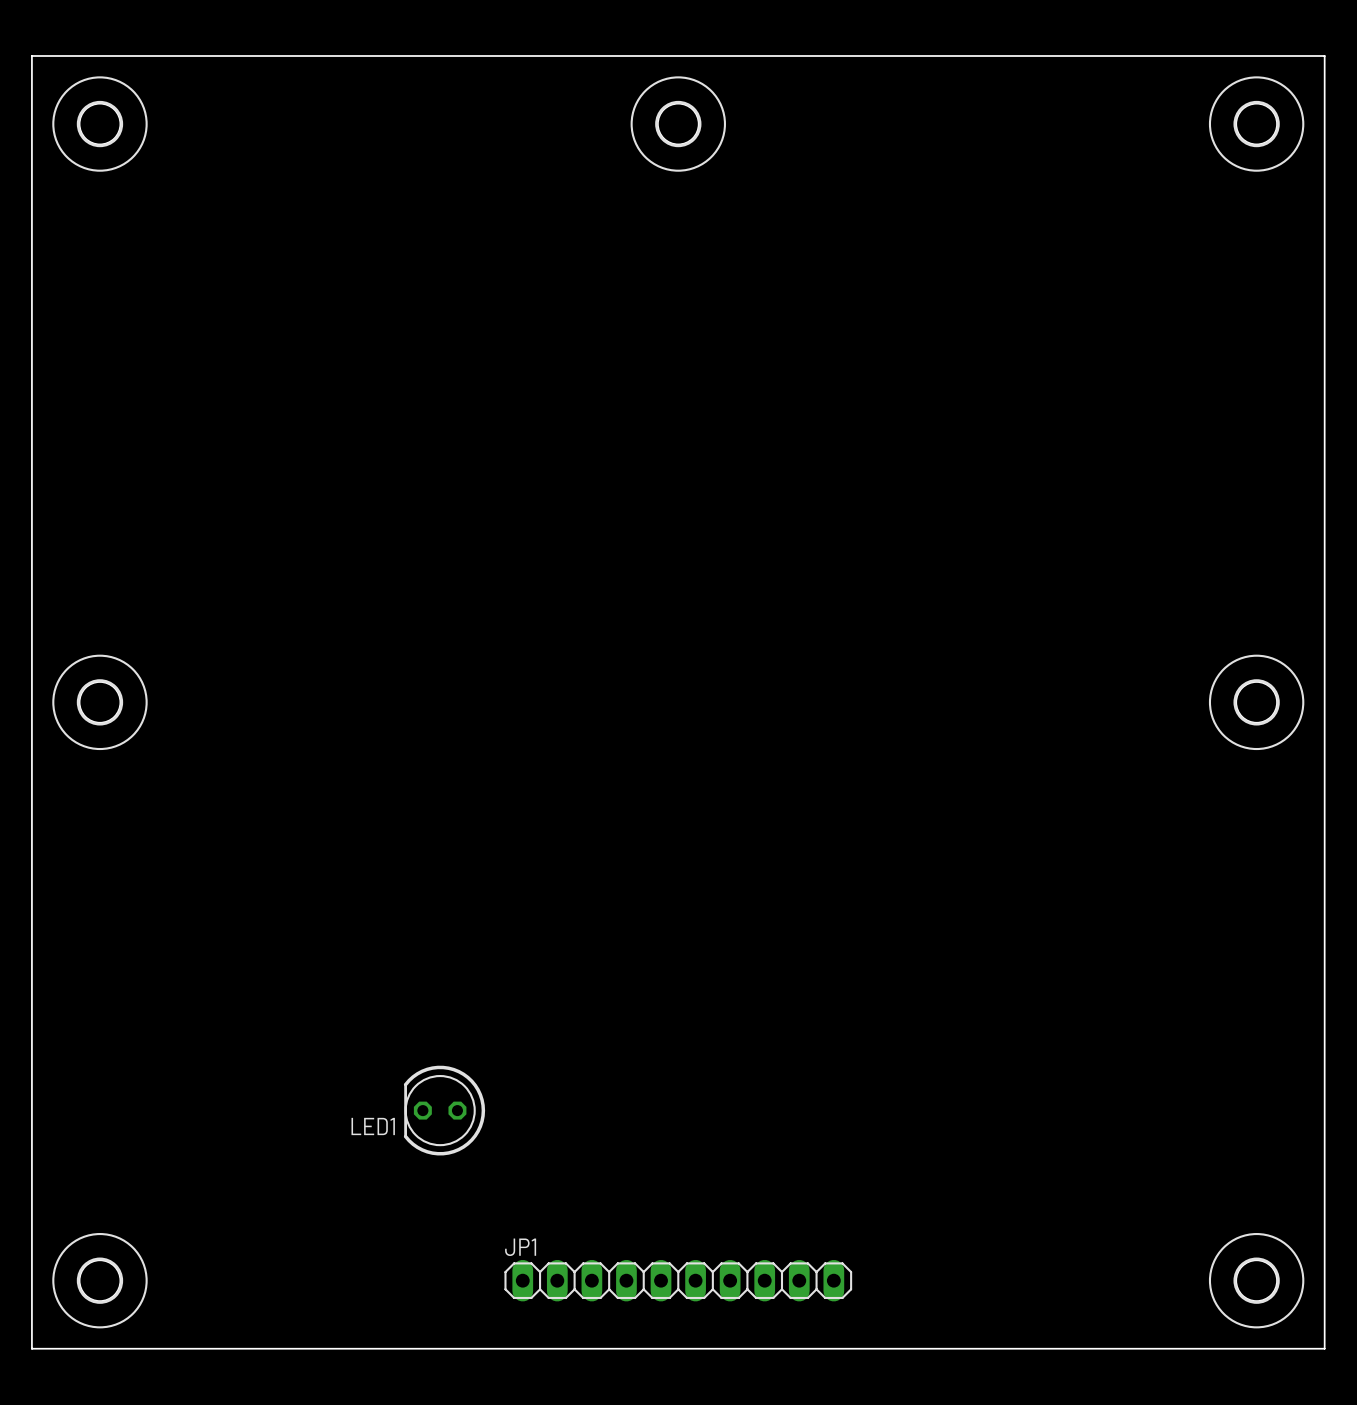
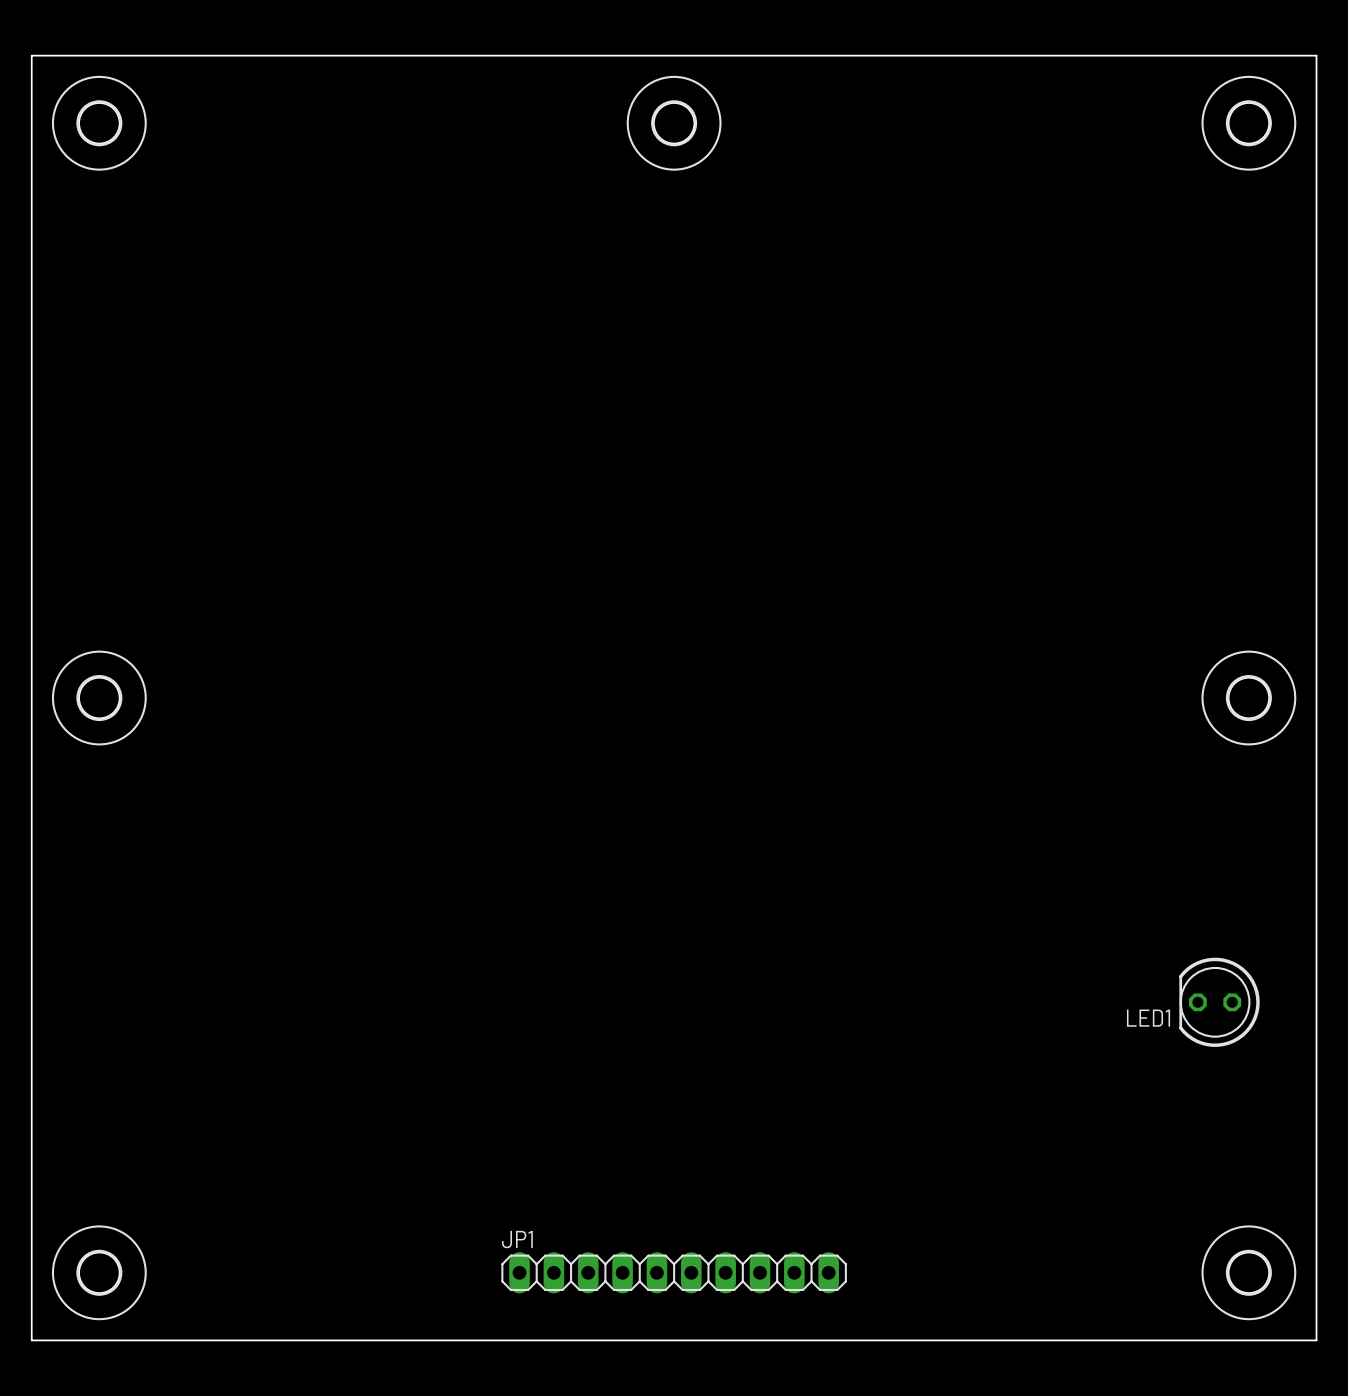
LED1 position: (444, 1110) -> (1219, 1002)

